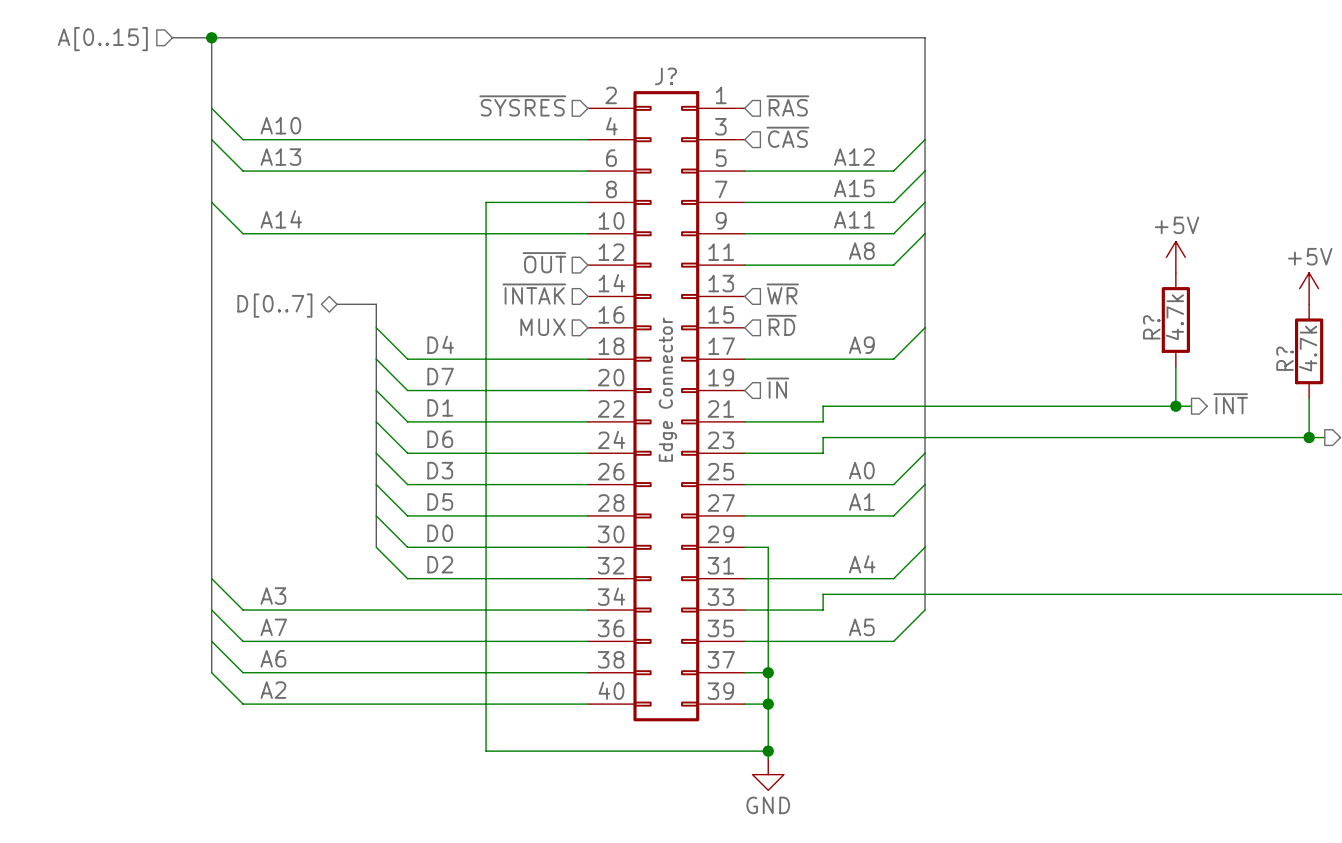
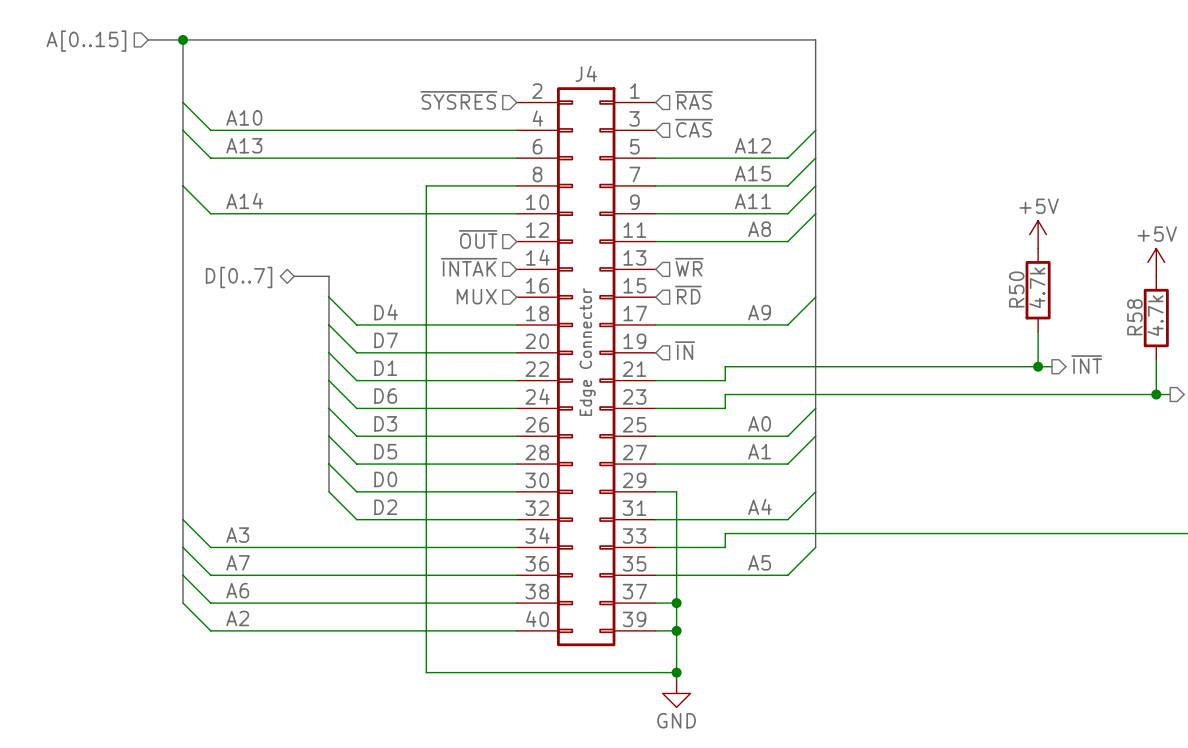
J? name: J? (665, 76) -> J4 (586, 73)
R? name: R? (1151, 327) -> R50 (1016, 289)
R? name: R? (1285, 358) -> R58 (1134, 317)

